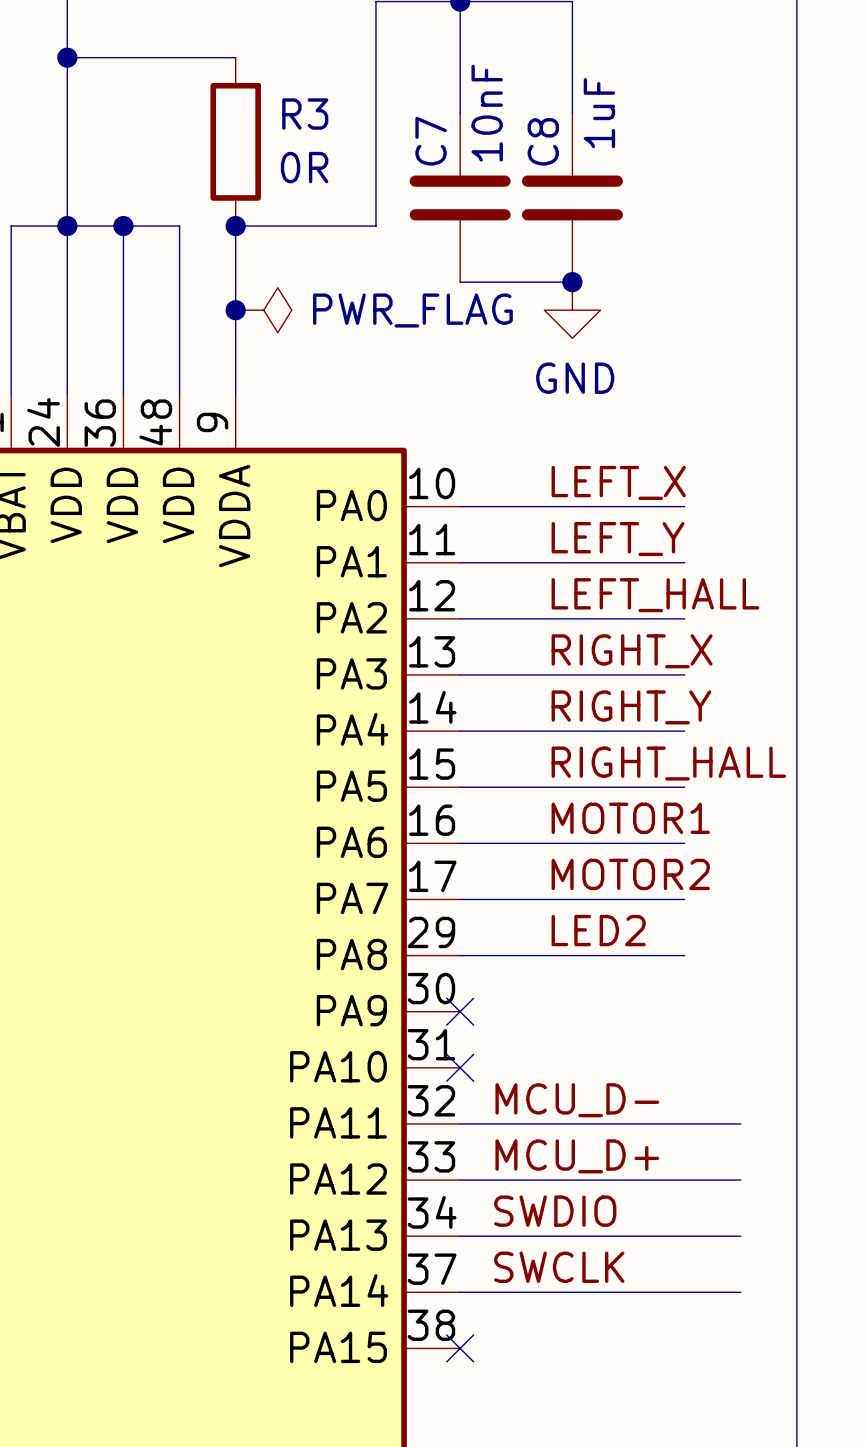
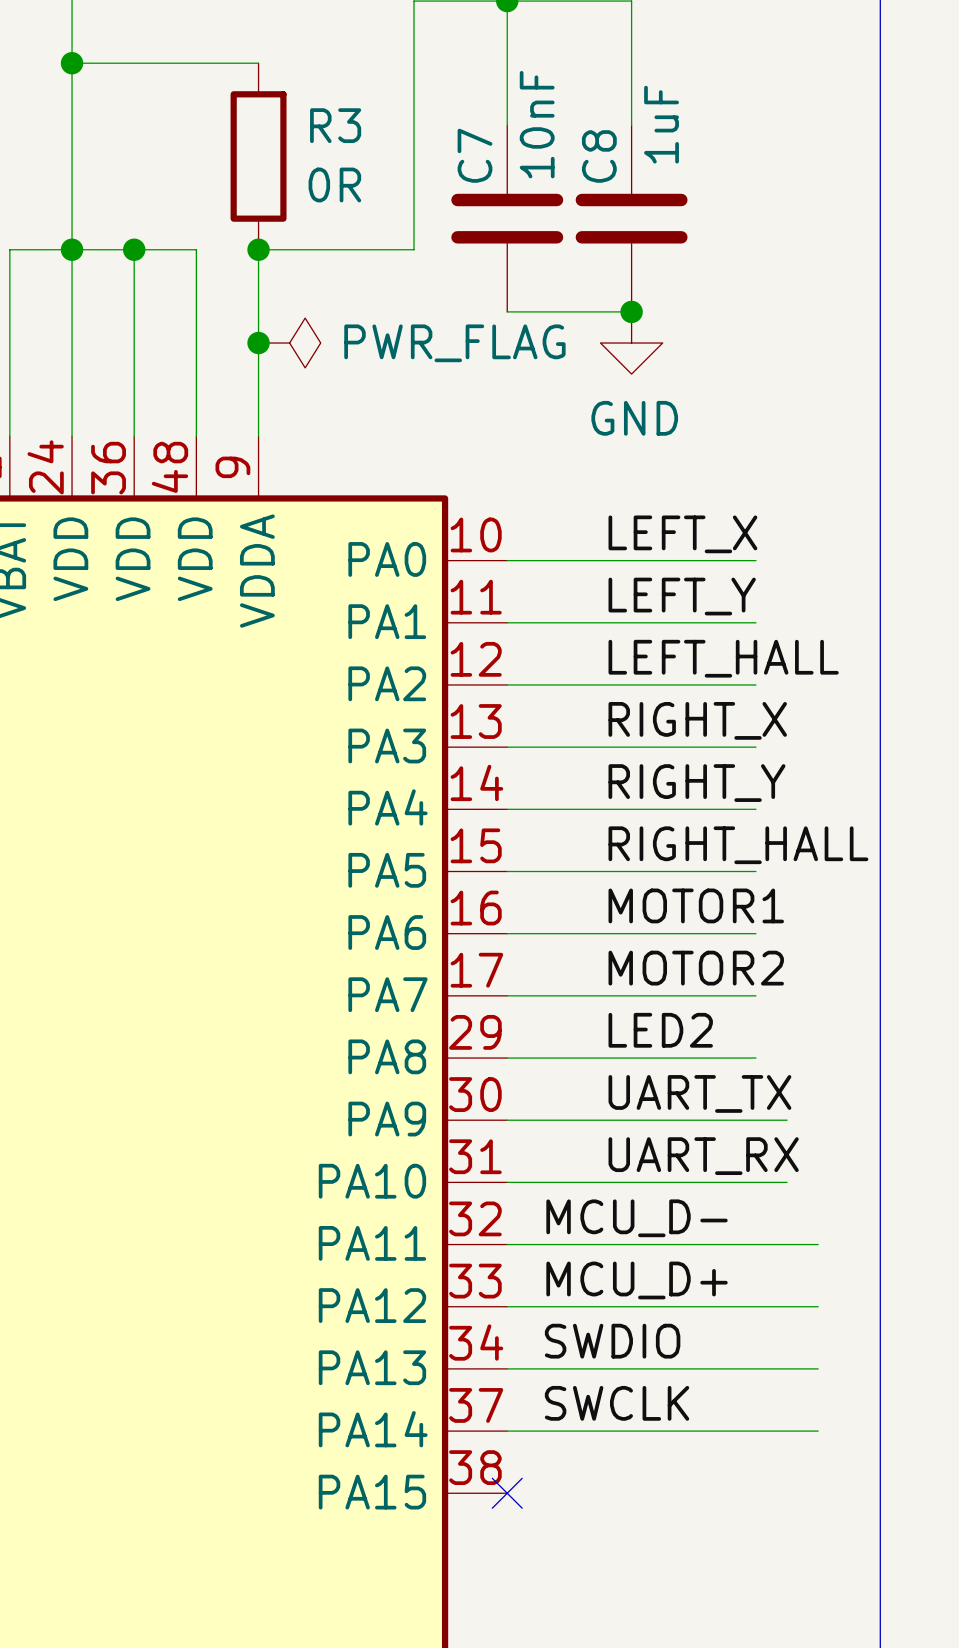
label: none -> UART_TX (699, 1093)
wire: none -> (507, 1120) (787, 1120)
no-connect mark: (460, 1011) -> none
label: none -> UART_RX (703, 1156)
wire: none -> (507, 1182) (787, 1182)
no-connect mark: (460, 1067) -> none

